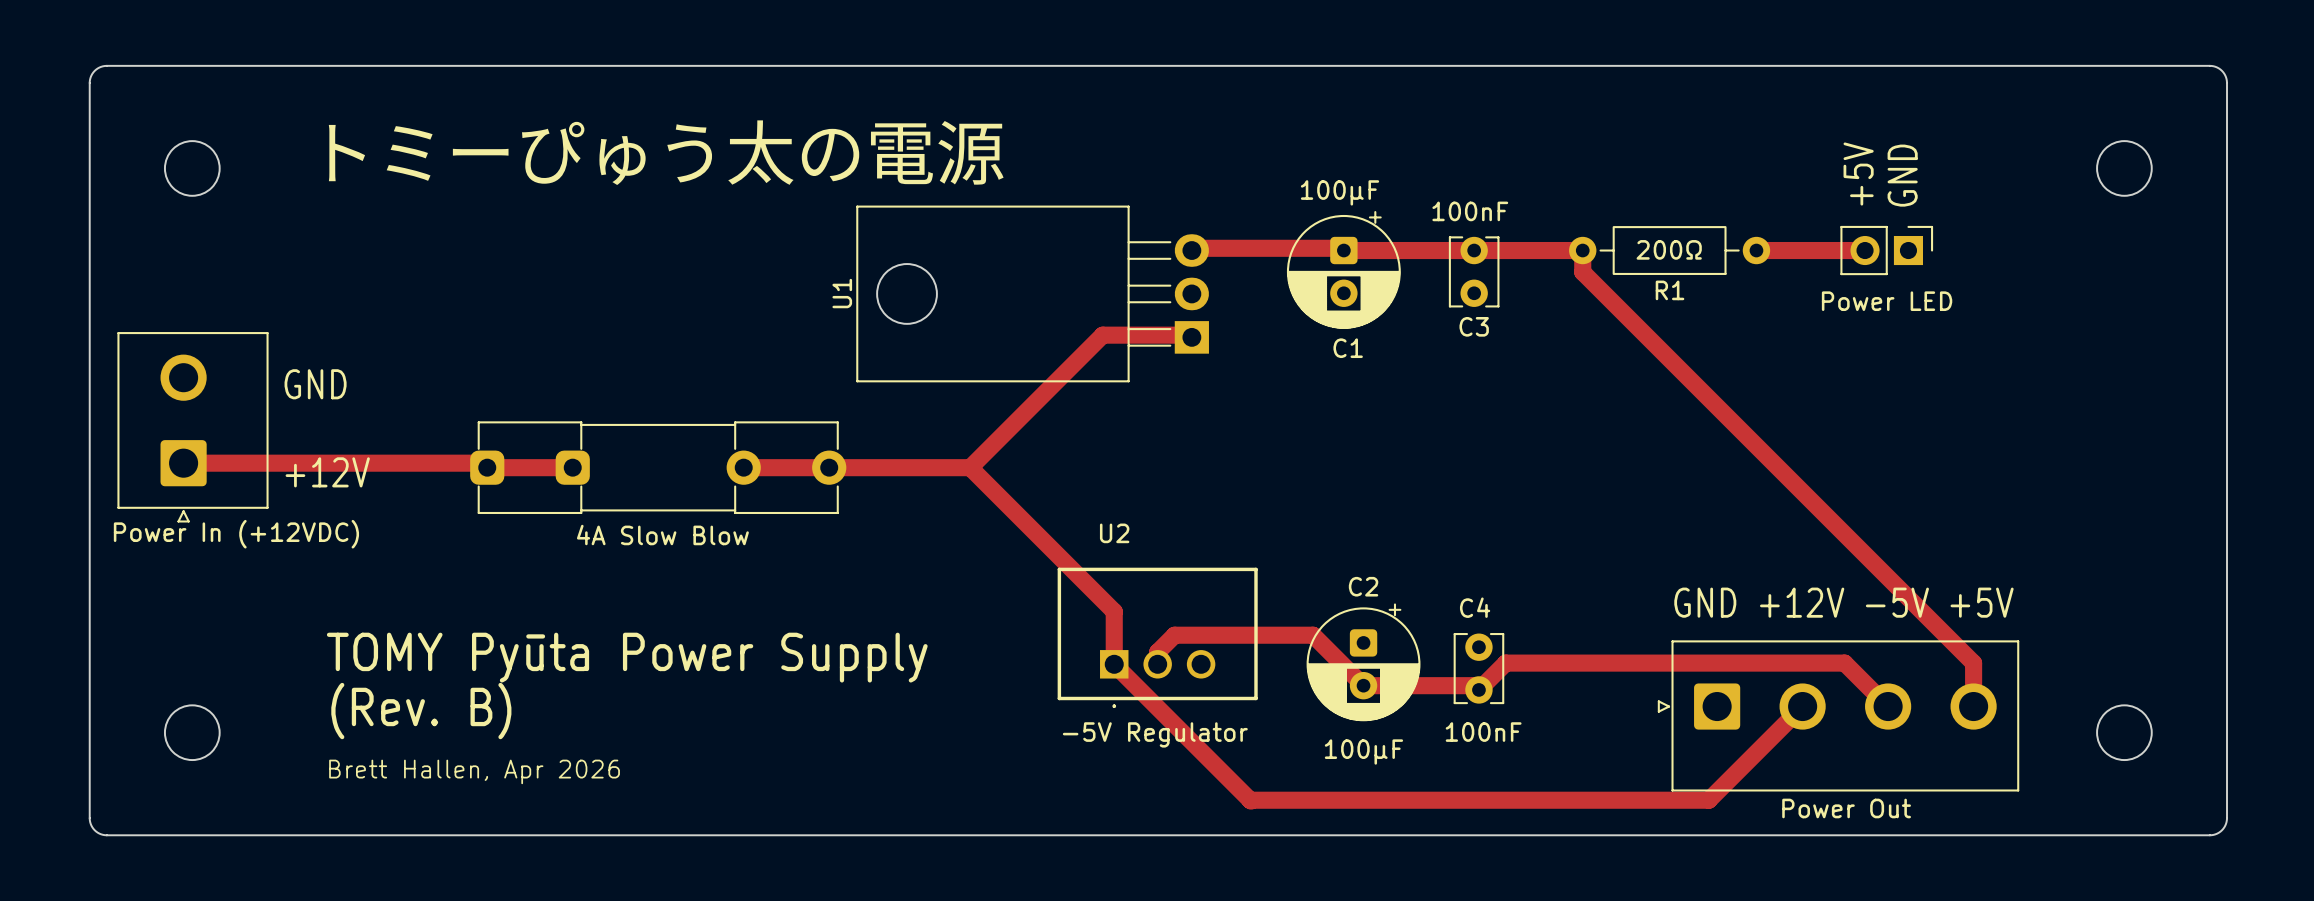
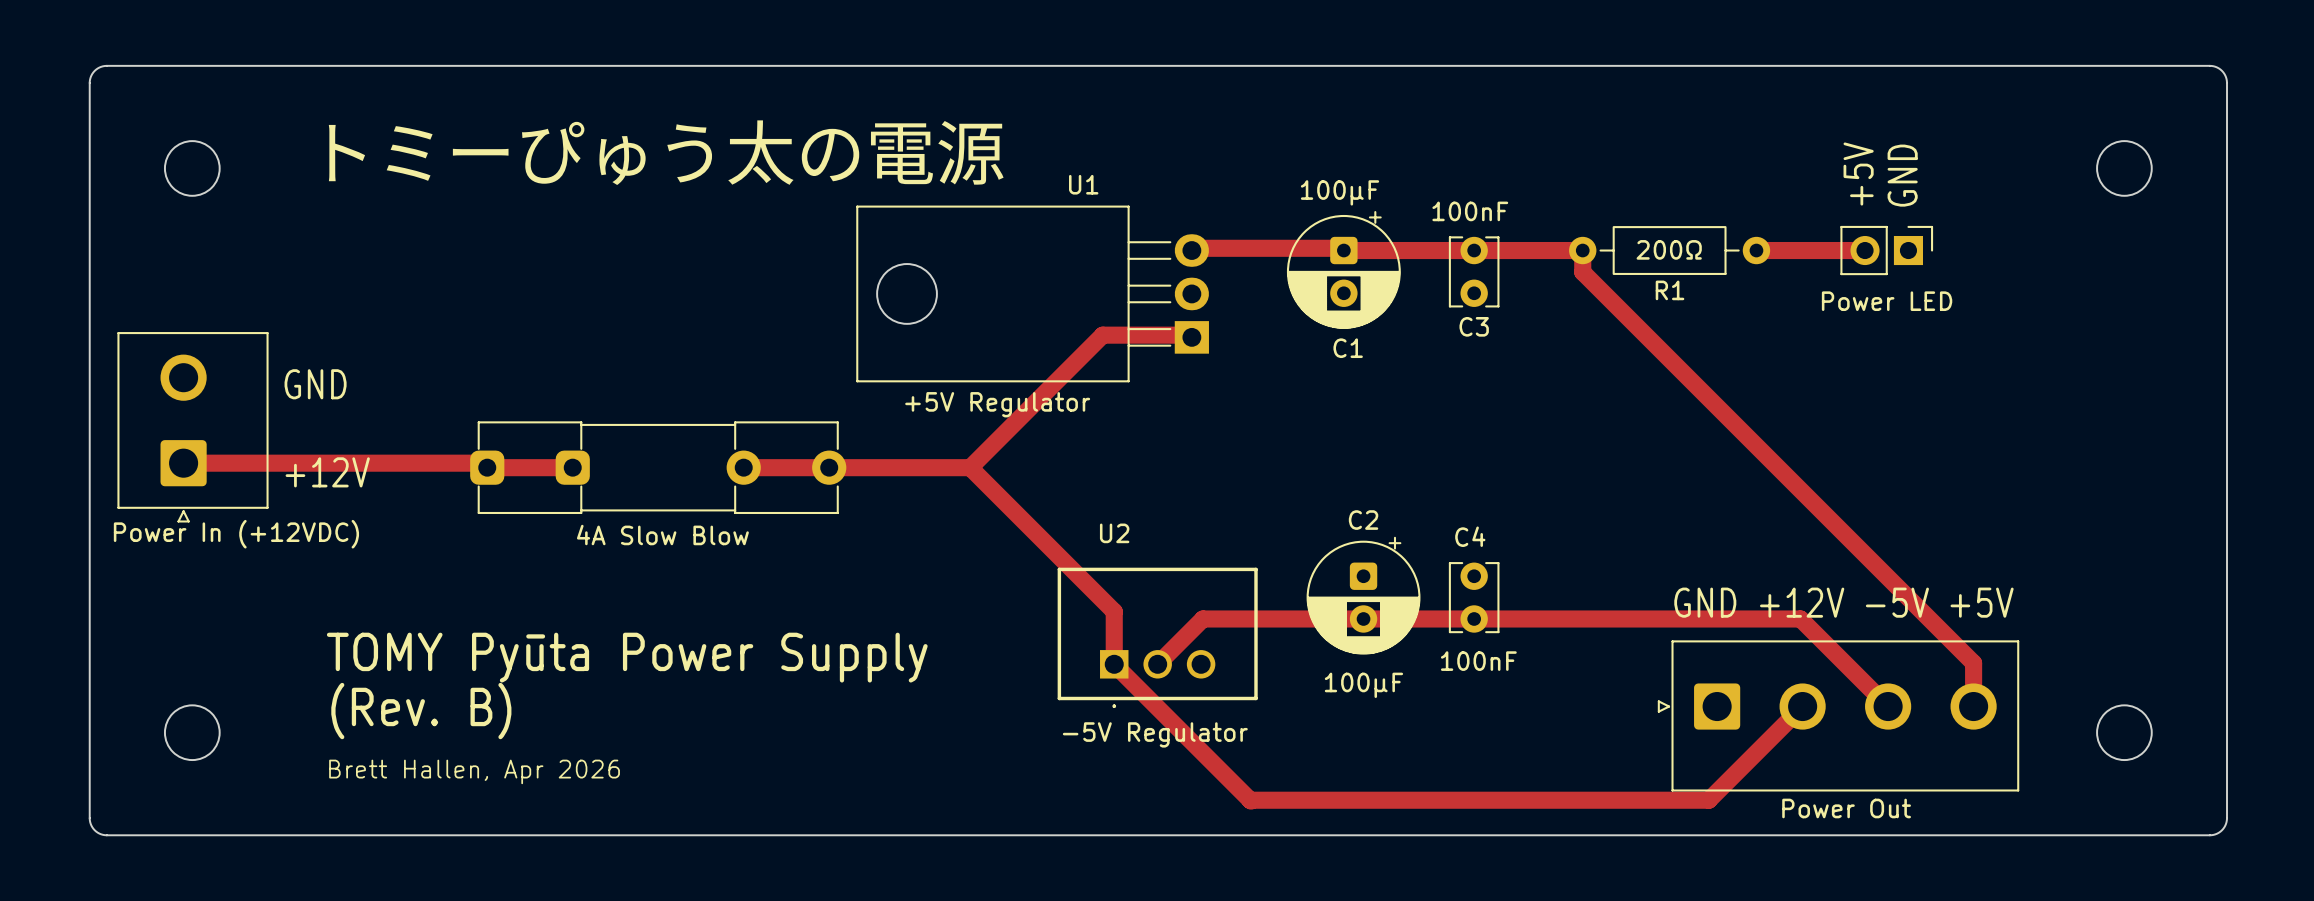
U1 name rotation: 0° (842, 293) -> 90° clockwise (1083, 184)
U1 name position: U1 (842, 293) -> U1 (1083, 184)
U1 value: none -> +5V Regulator (997, 404)
C2 position: (1363, 662) -> (1363, 595)
track: (1844, 663) (1505, 663) (1478, 689) (1474, 685) (1363, 685) (1313, 635) (1174, 635) (1157, 652) (1157, 664) -> (1844, 663) (1800, 618) (1202, 618) (1157, 664)
C4 position: (1478, 668) -> (1474, 597)

